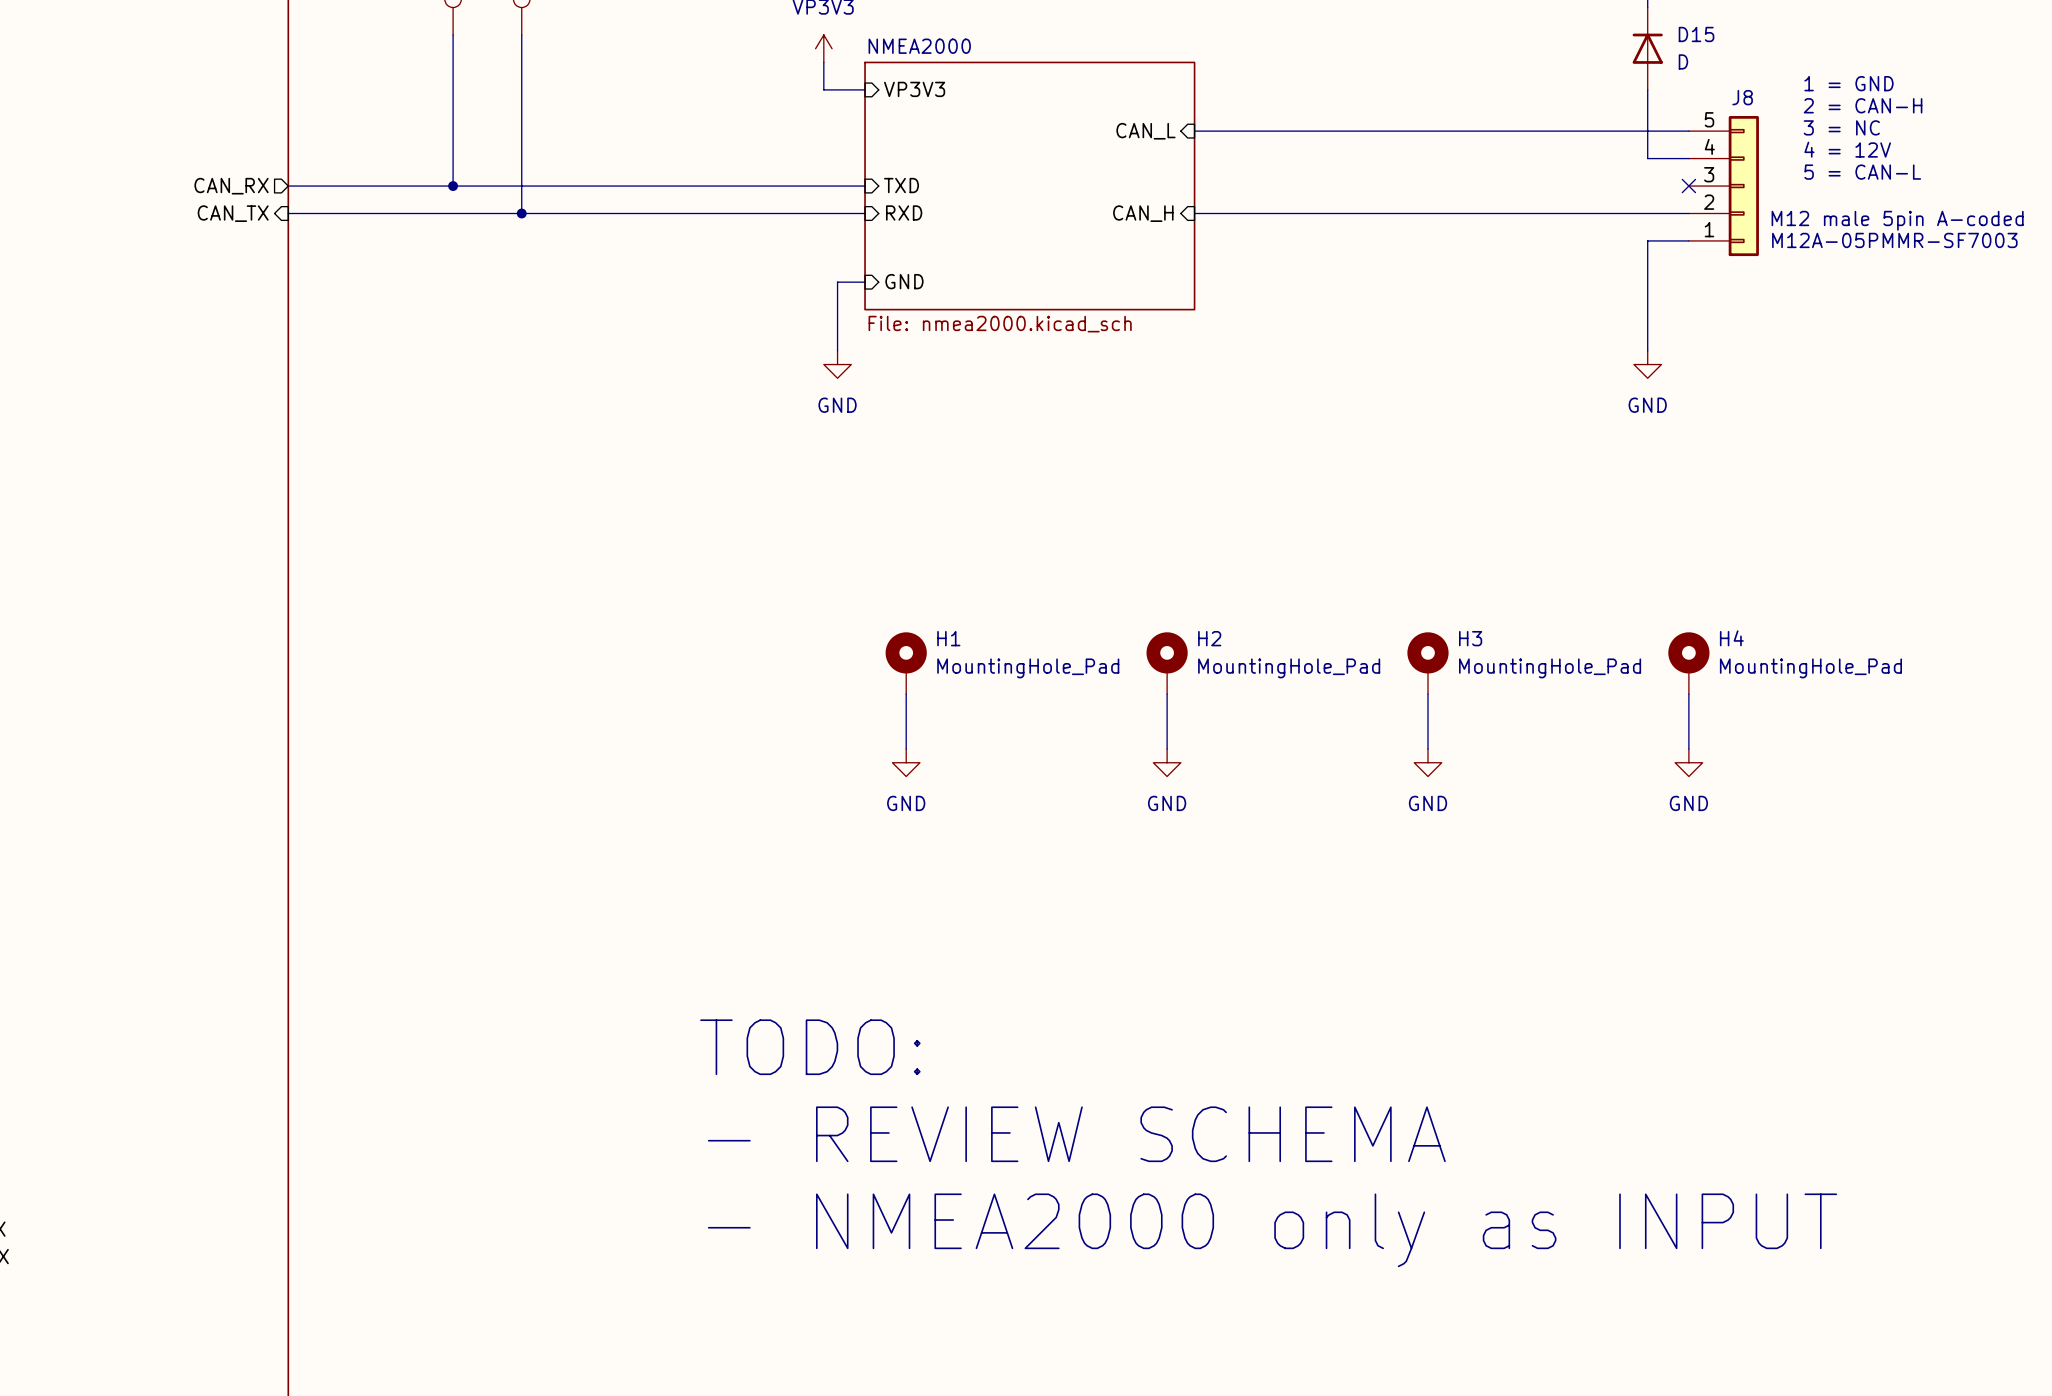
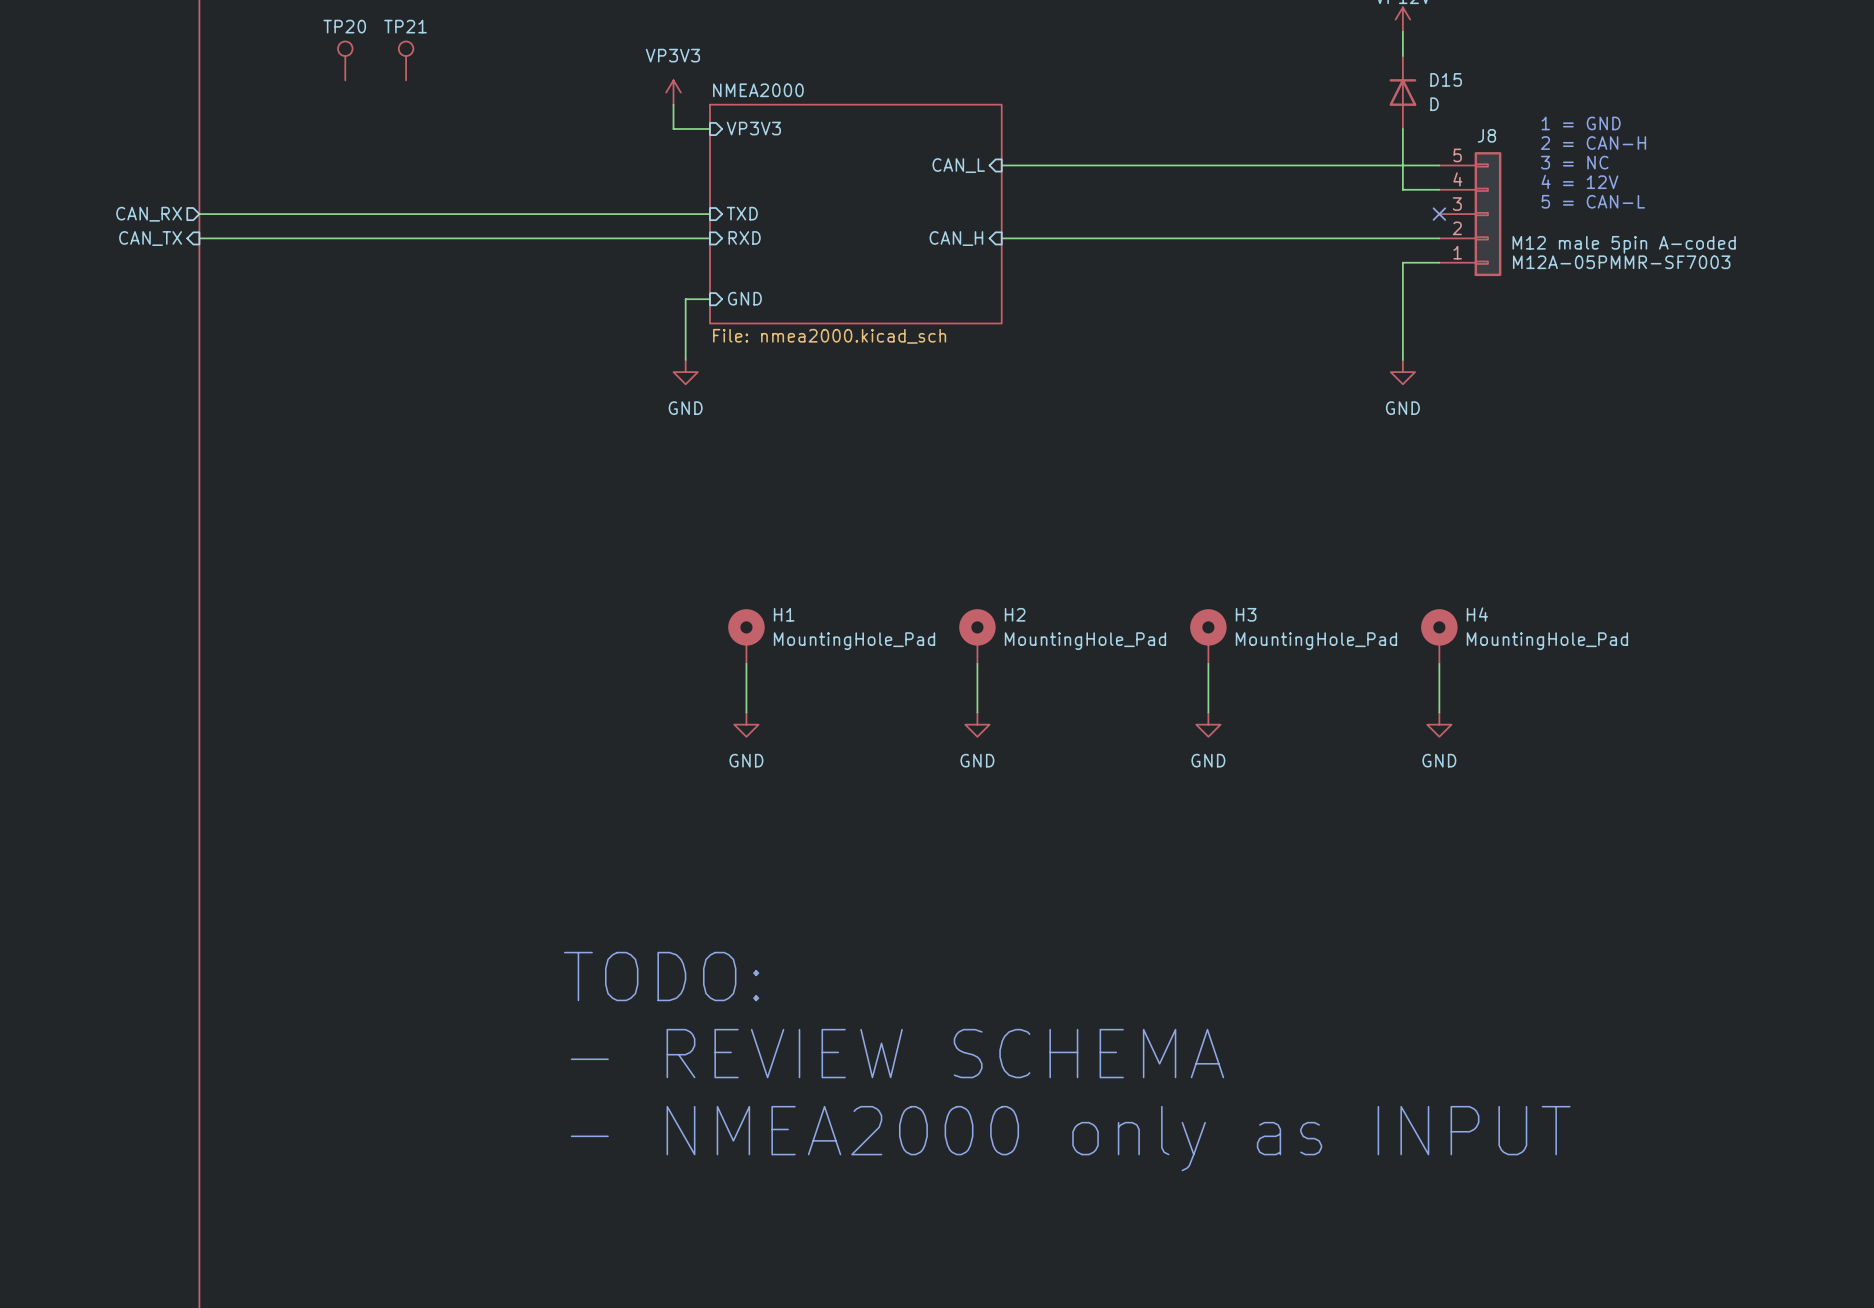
wire: (453, 34) (453, 186) -> none
wire: (521, 34) (521, 213) -> none
junction: (453, 186) -> none
junction: (521, 213) -> none

